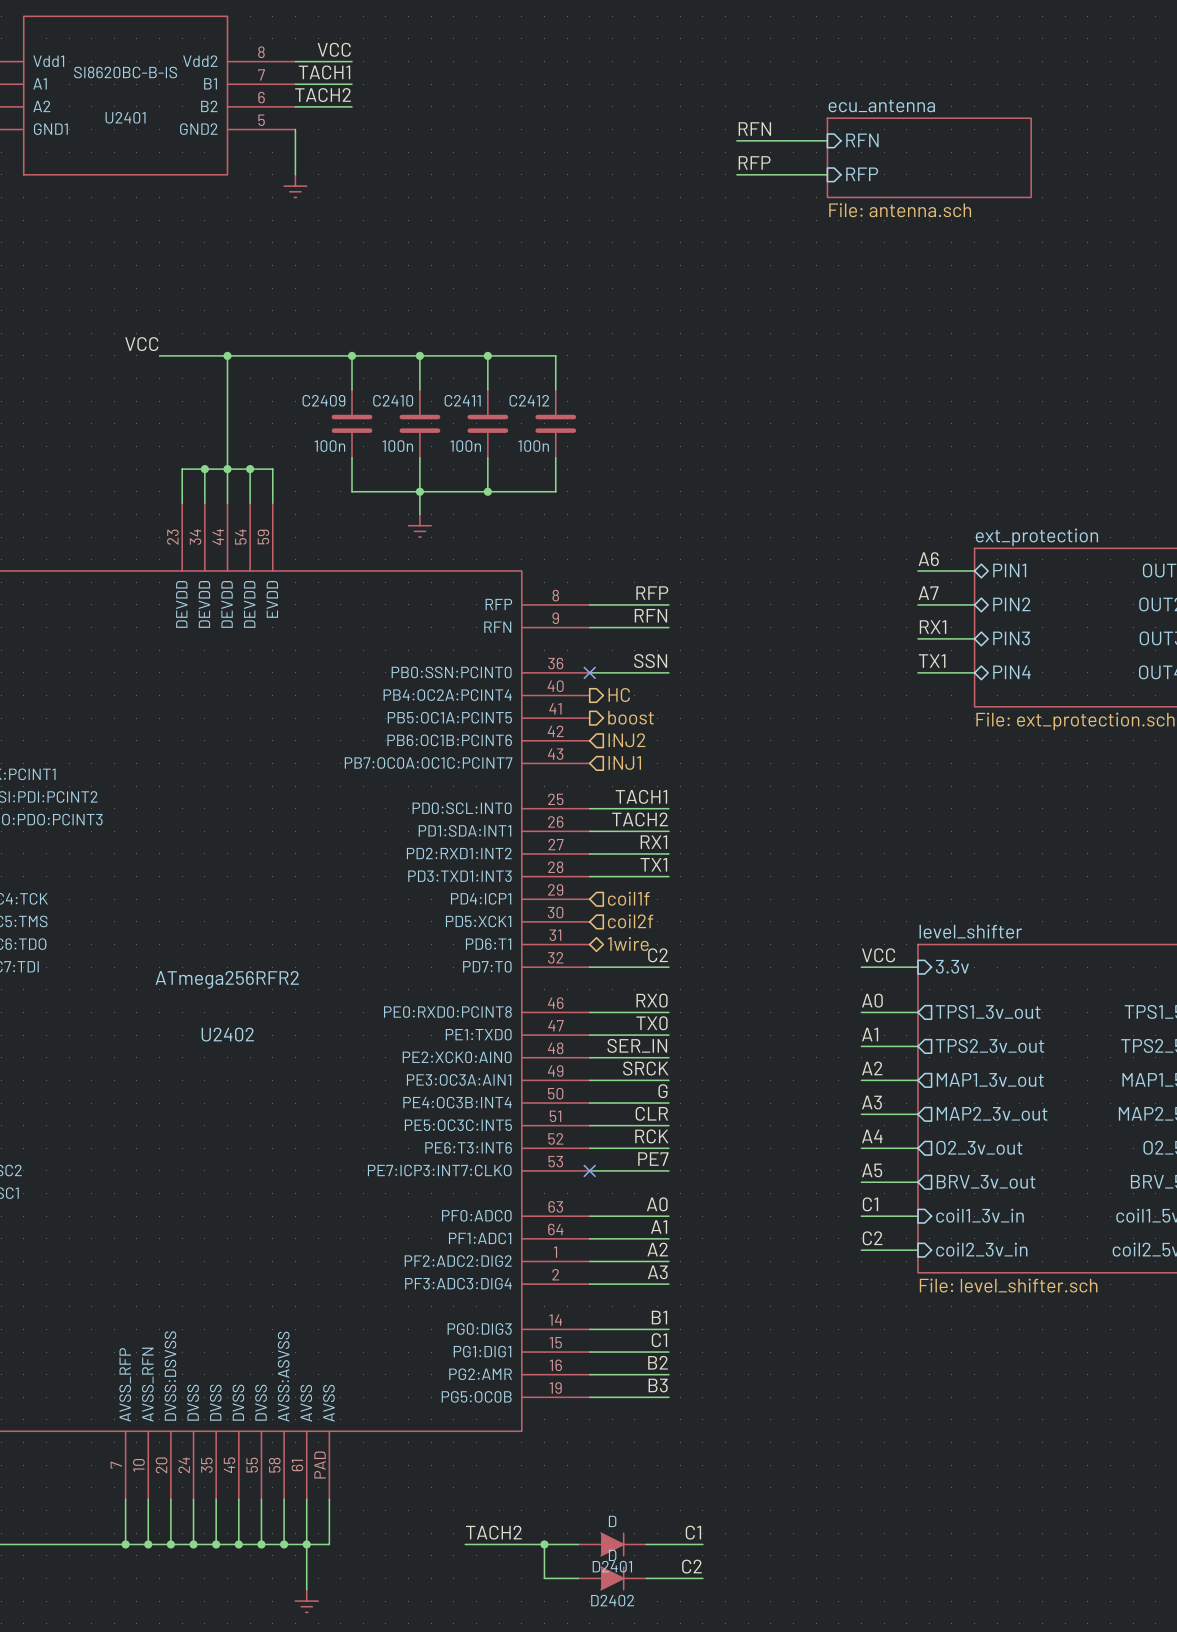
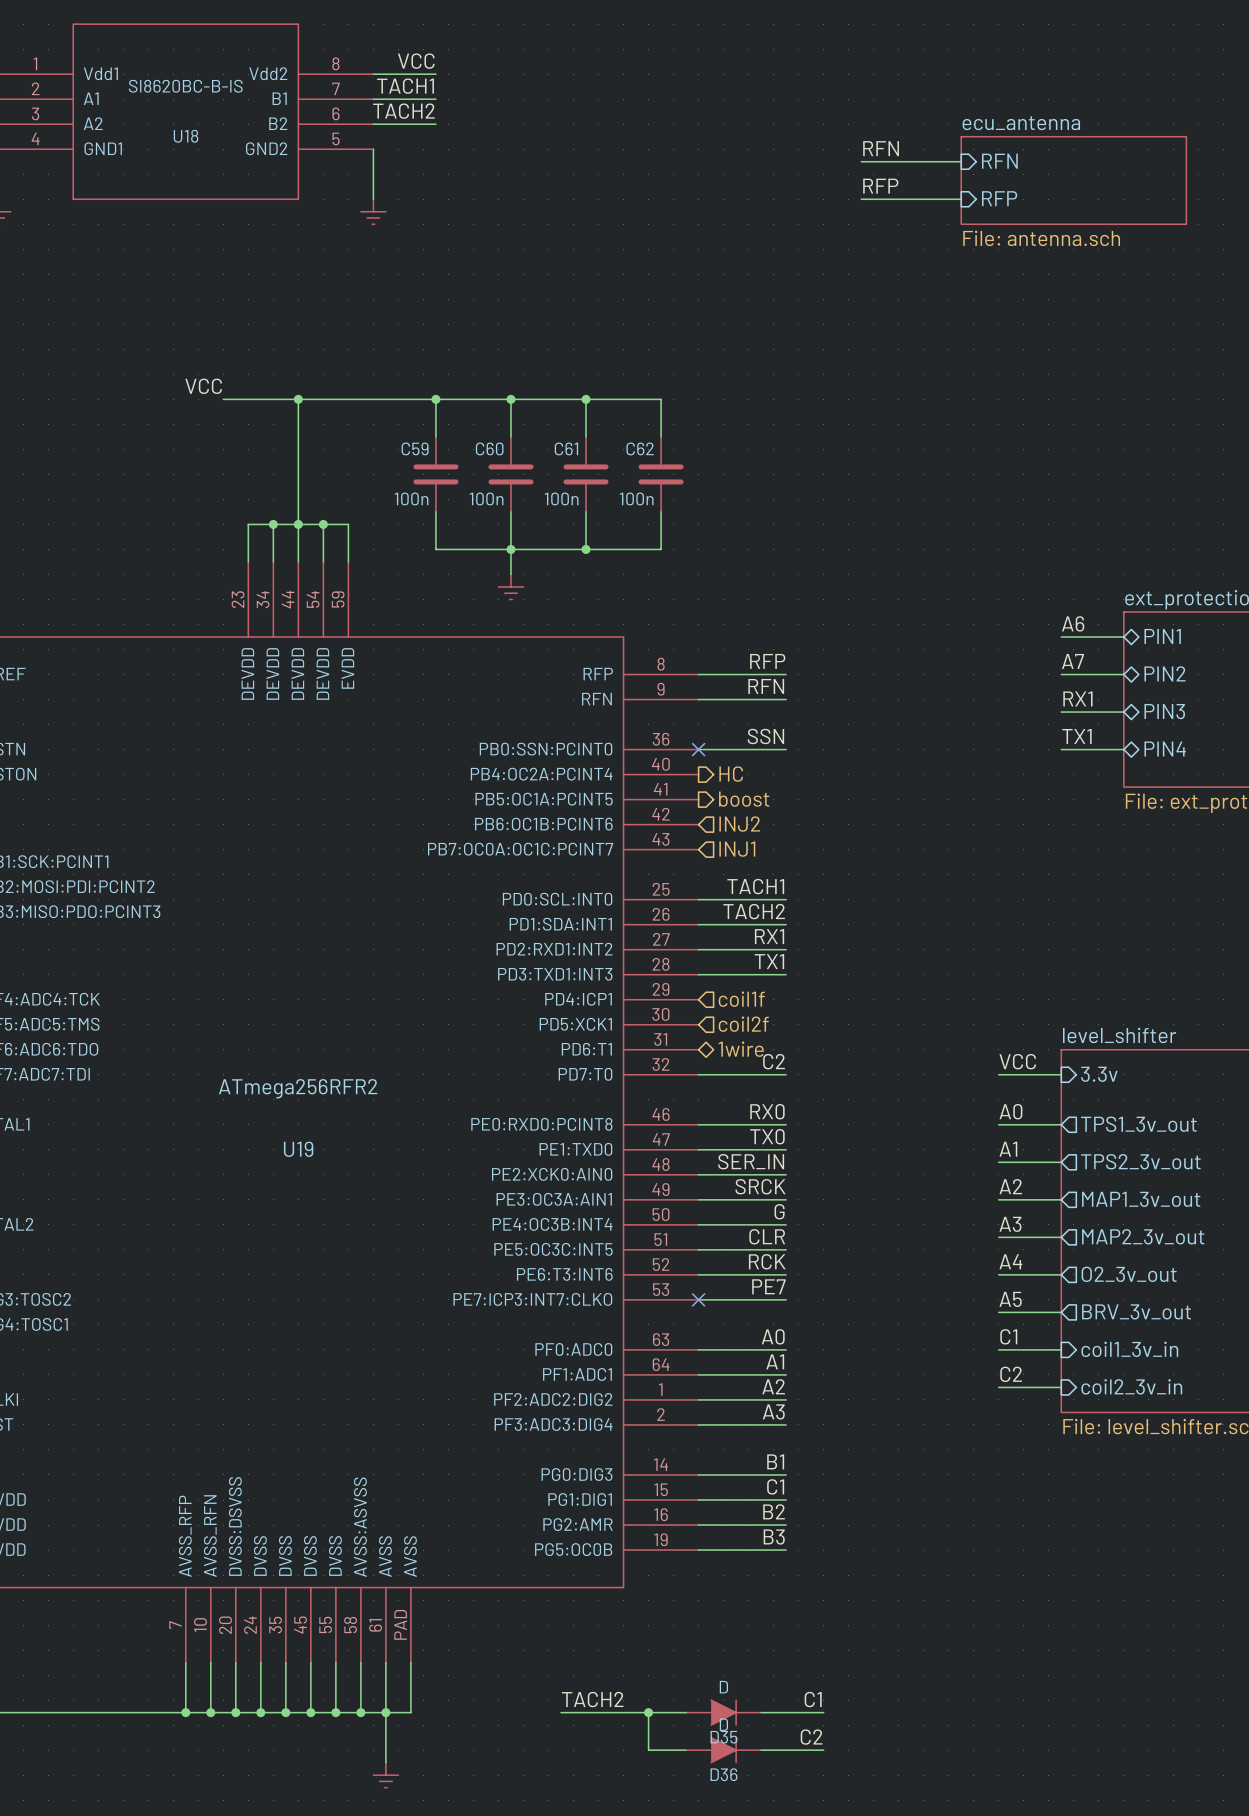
U2401 name: U2401 (125, 117) -> U18 (186, 136)
C2409 name: C2409 (323, 400) -> C59 (415, 448)
C2410 name: C2410 (393, 400) -> C60 (489, 448)
C2411 name: C2411 (462, 400) -> C61 (566, 448)
C2412 name: C2412 (529, 400) -> C62 (640, 448)
U2402 name: U2402 (227, 1034) -> U19 (298, 1149)
D2401 name: D2401 (612, 1566) -> D35 (724, 1737)
D2402 name: D2402 (612, 1600) -> D36 (724, 1774)

